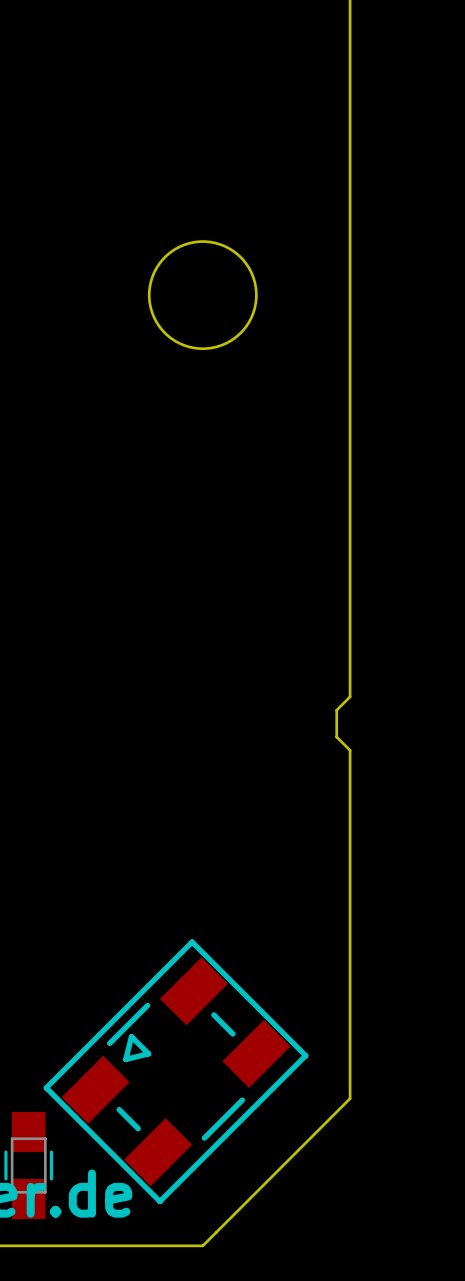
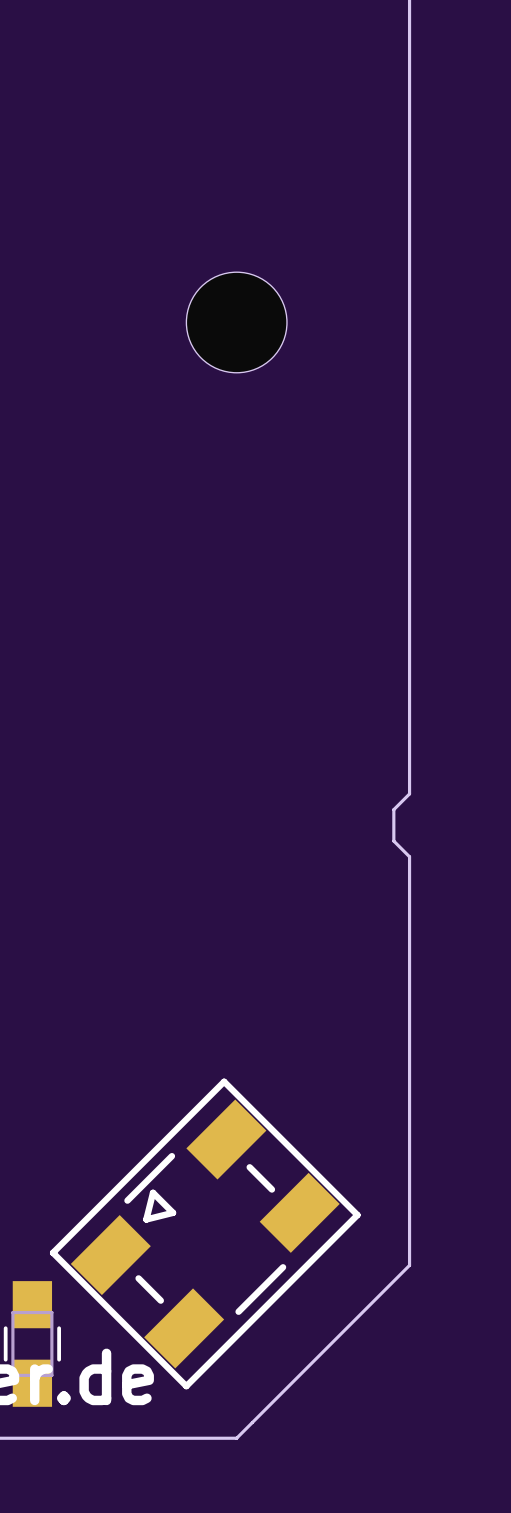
round board edge: [147, 240, 258, 351] -> none
part: none -> (236, 322)

